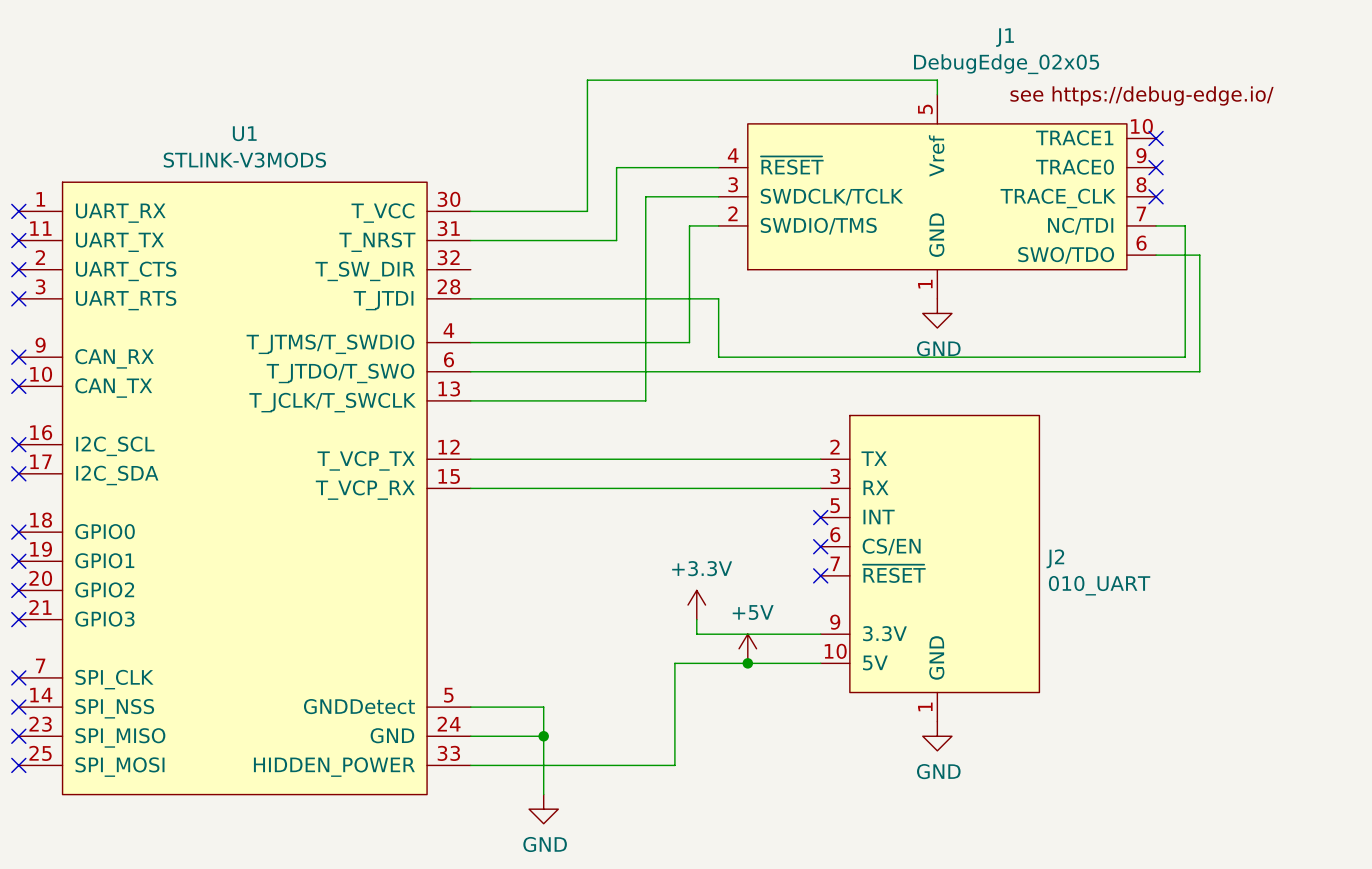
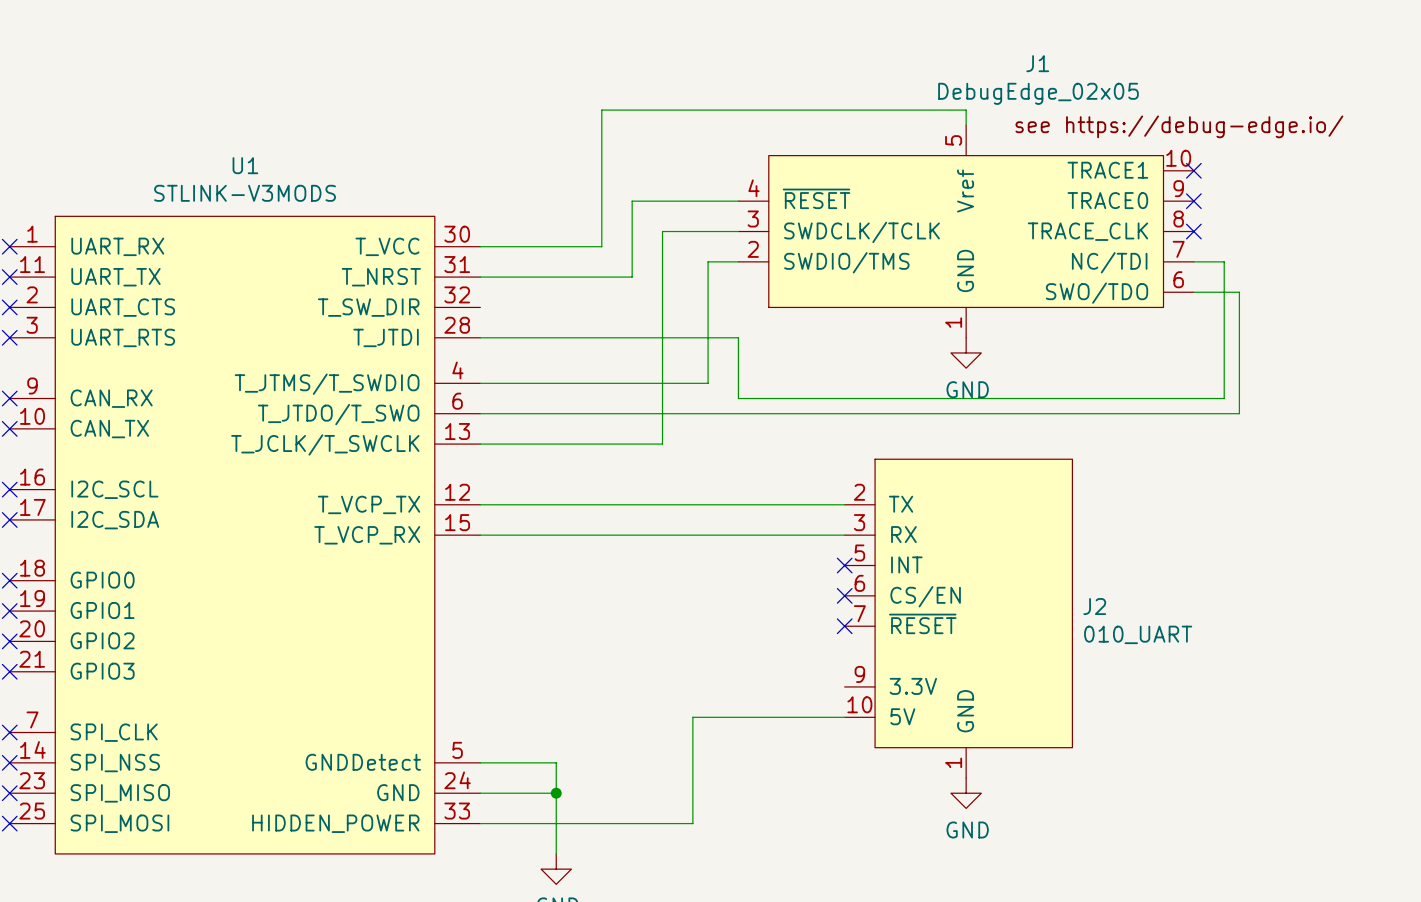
power symbol: +3.3V (696, 605) -> none
wire: (696, 619) (696, 634) (820, 634) -> none
power symbol: +5V (747, 648) -> none
junction: (747, 663) -> none

